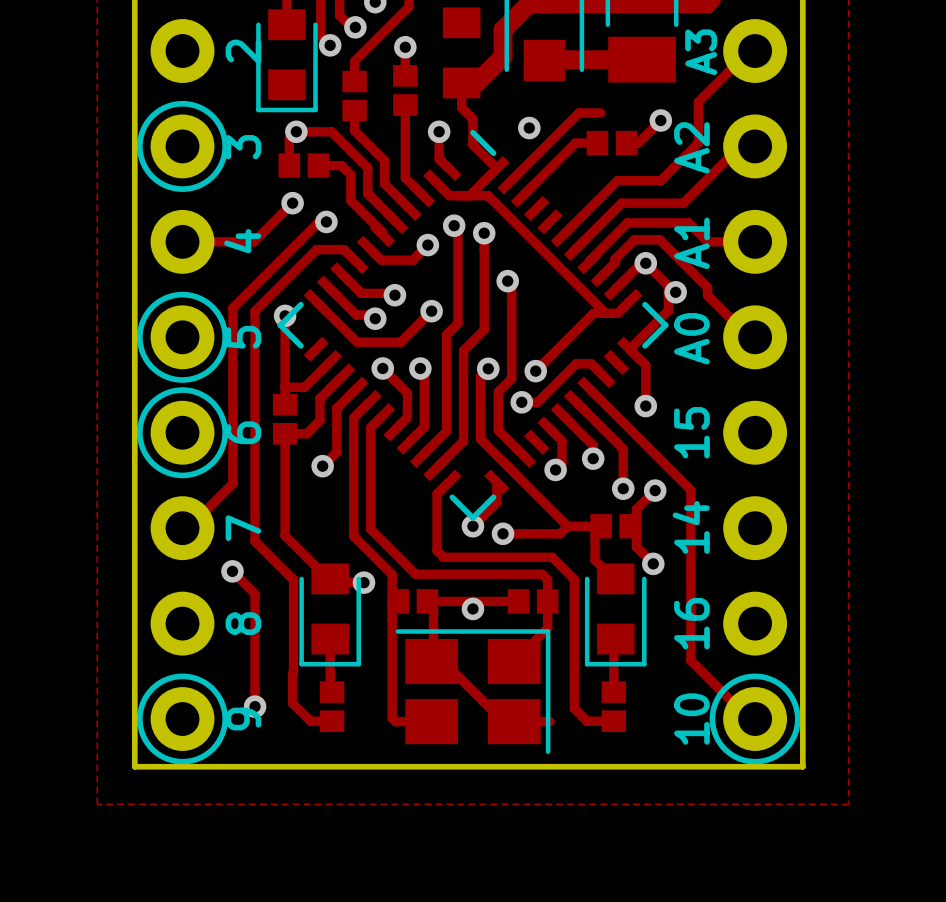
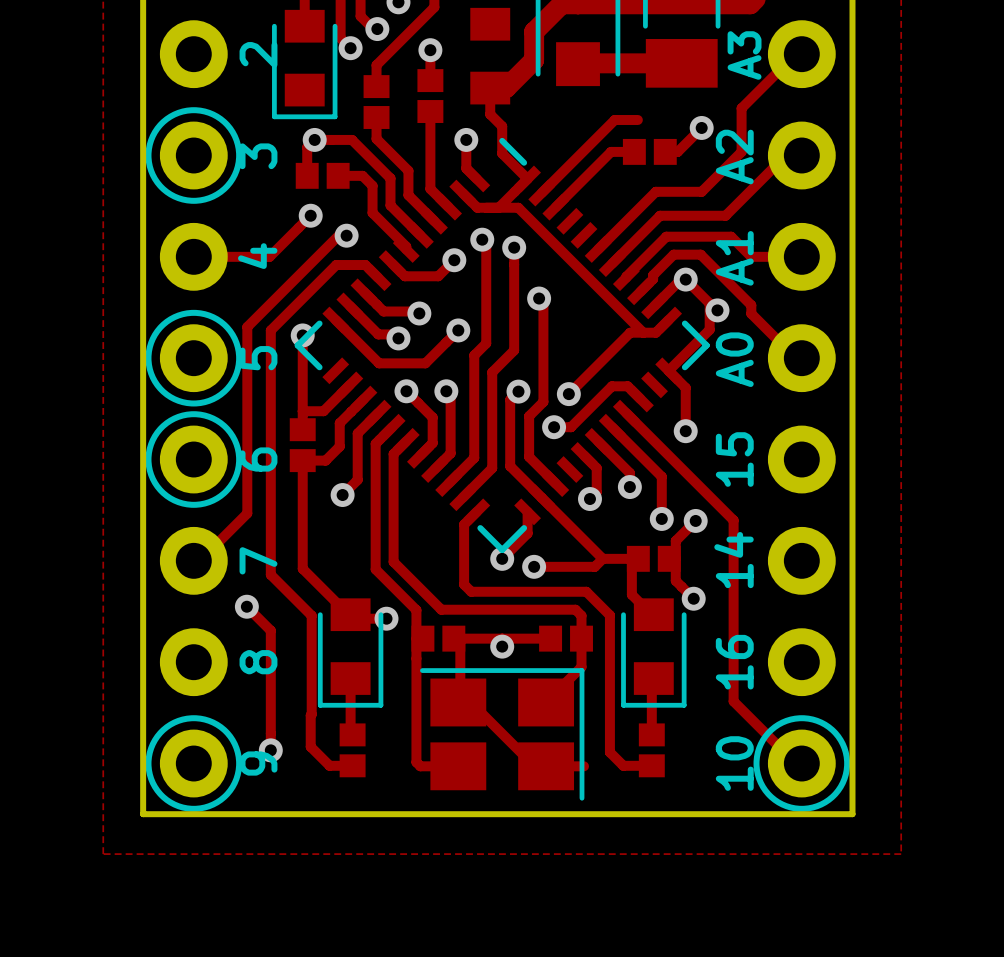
via: (529, 128) -> none

